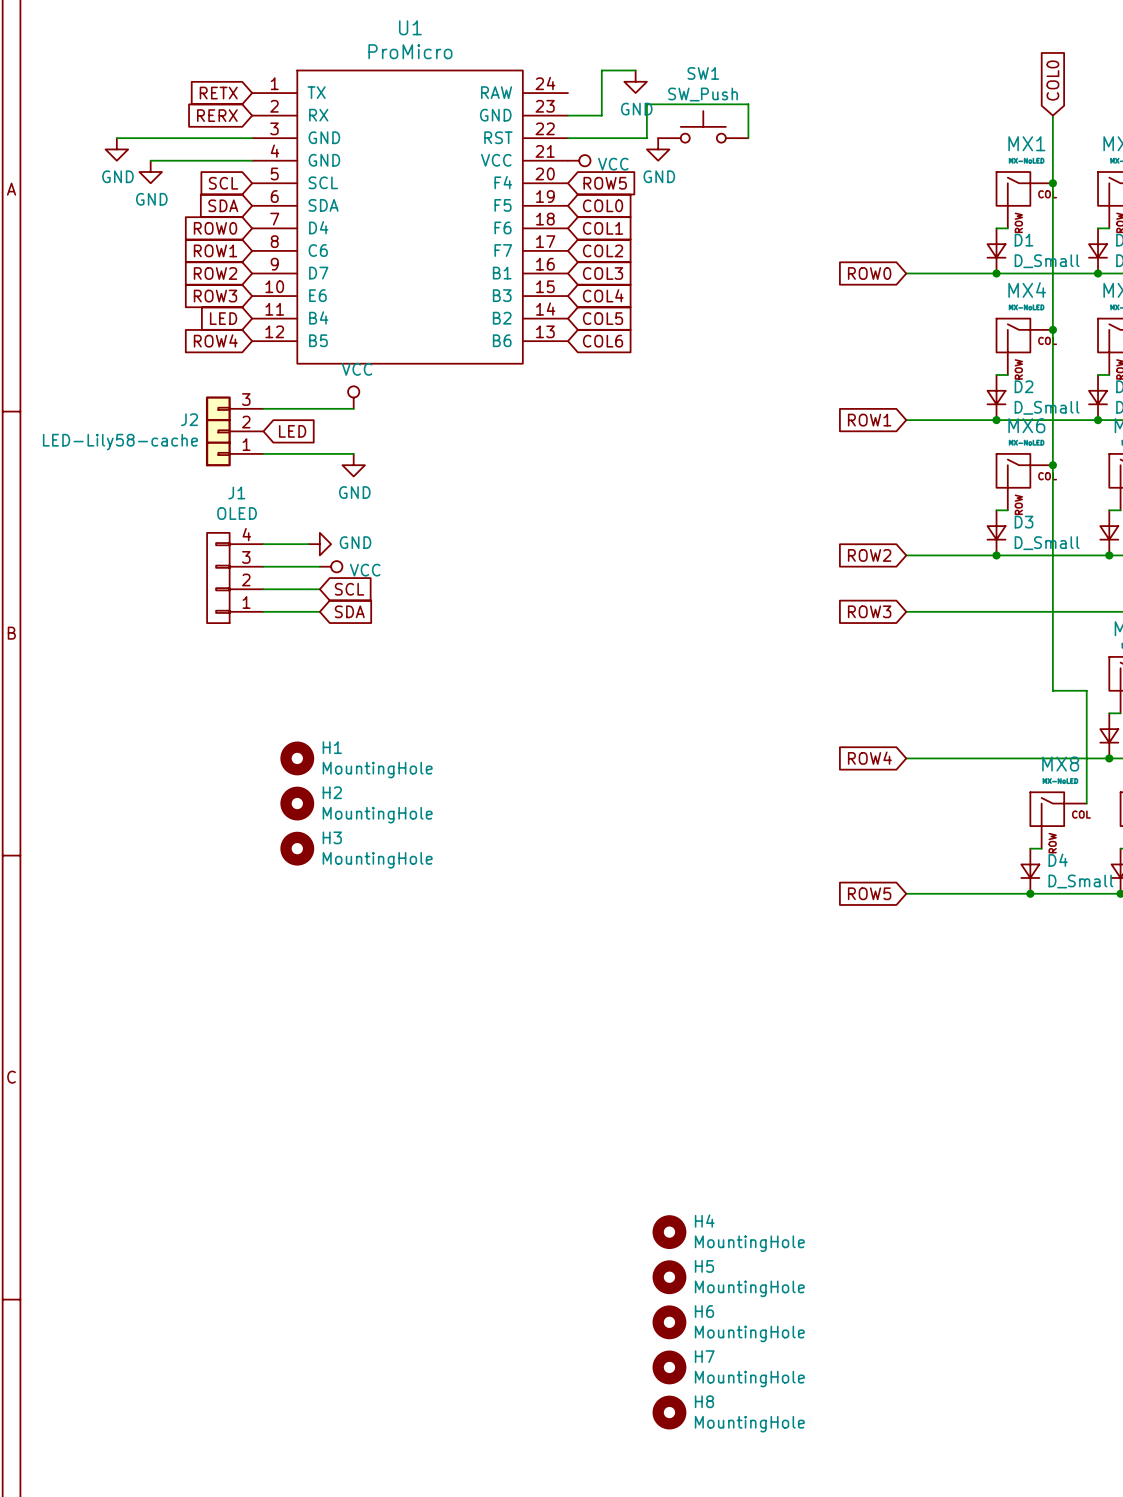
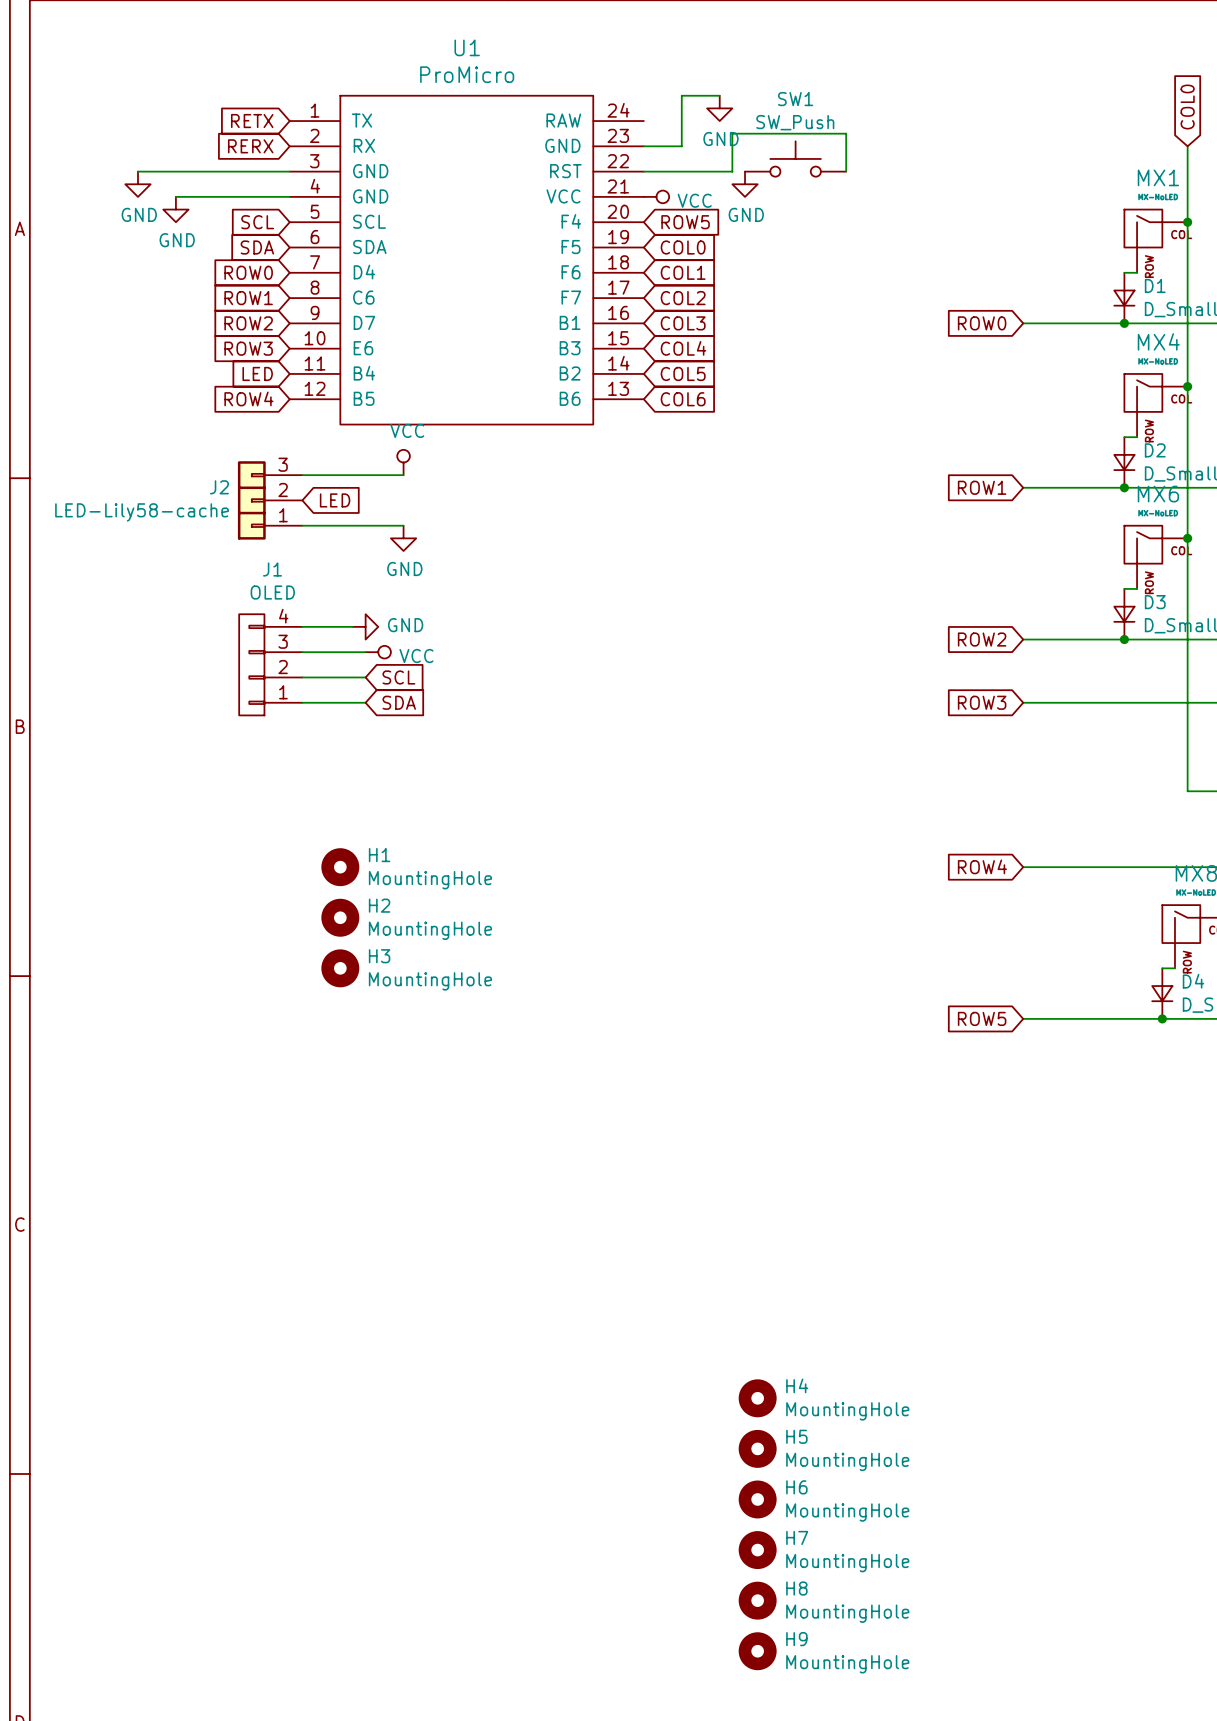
H9: none -> MountingHole (757, 1651)

